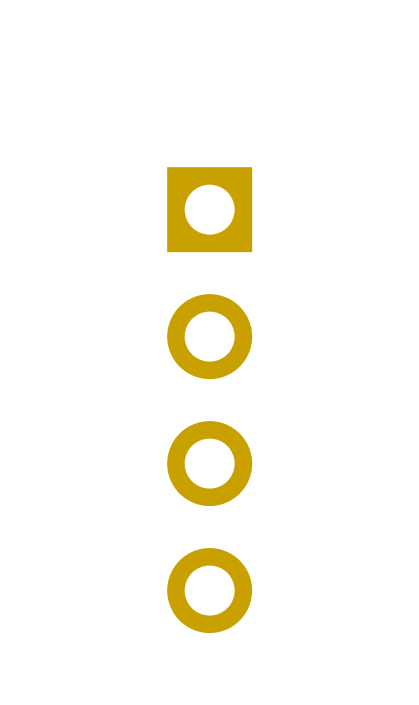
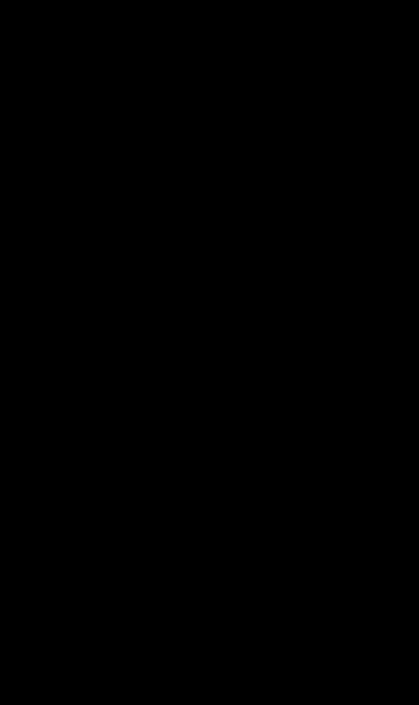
part: (209, 400) -> none

